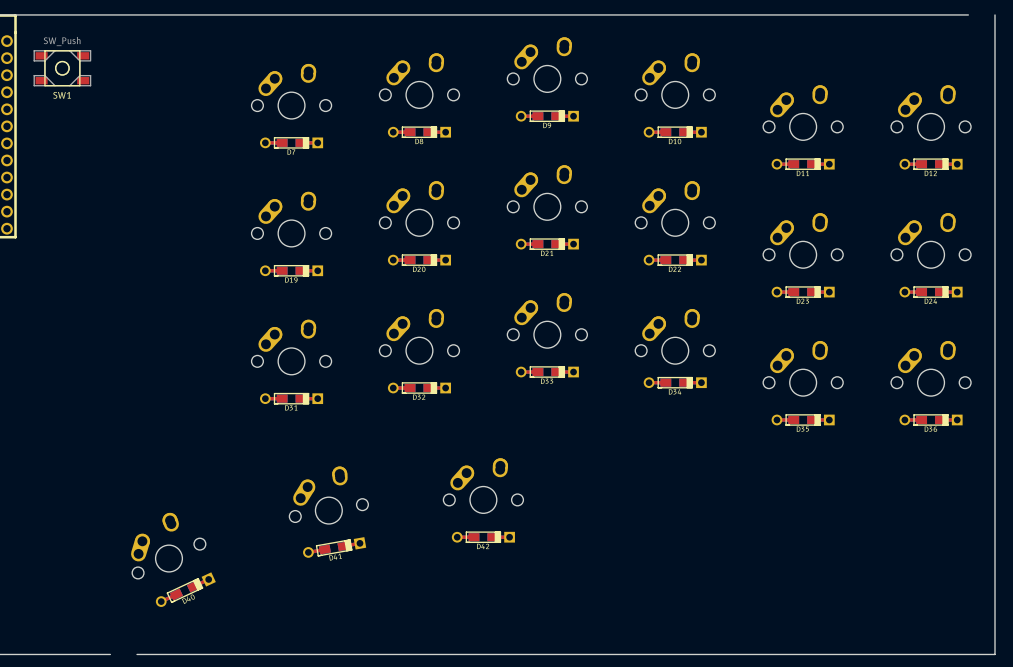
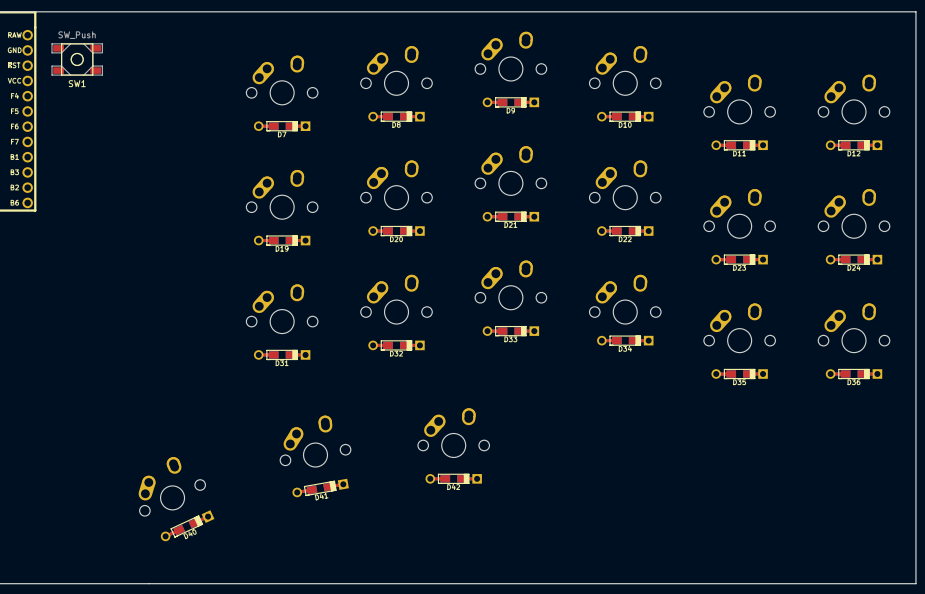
board edge: (995, 14) (995, 654) -> (887, 11) (915, 11) (915, 583) (911, 583)
board edge: none -> (120, 583) (143, 583)

